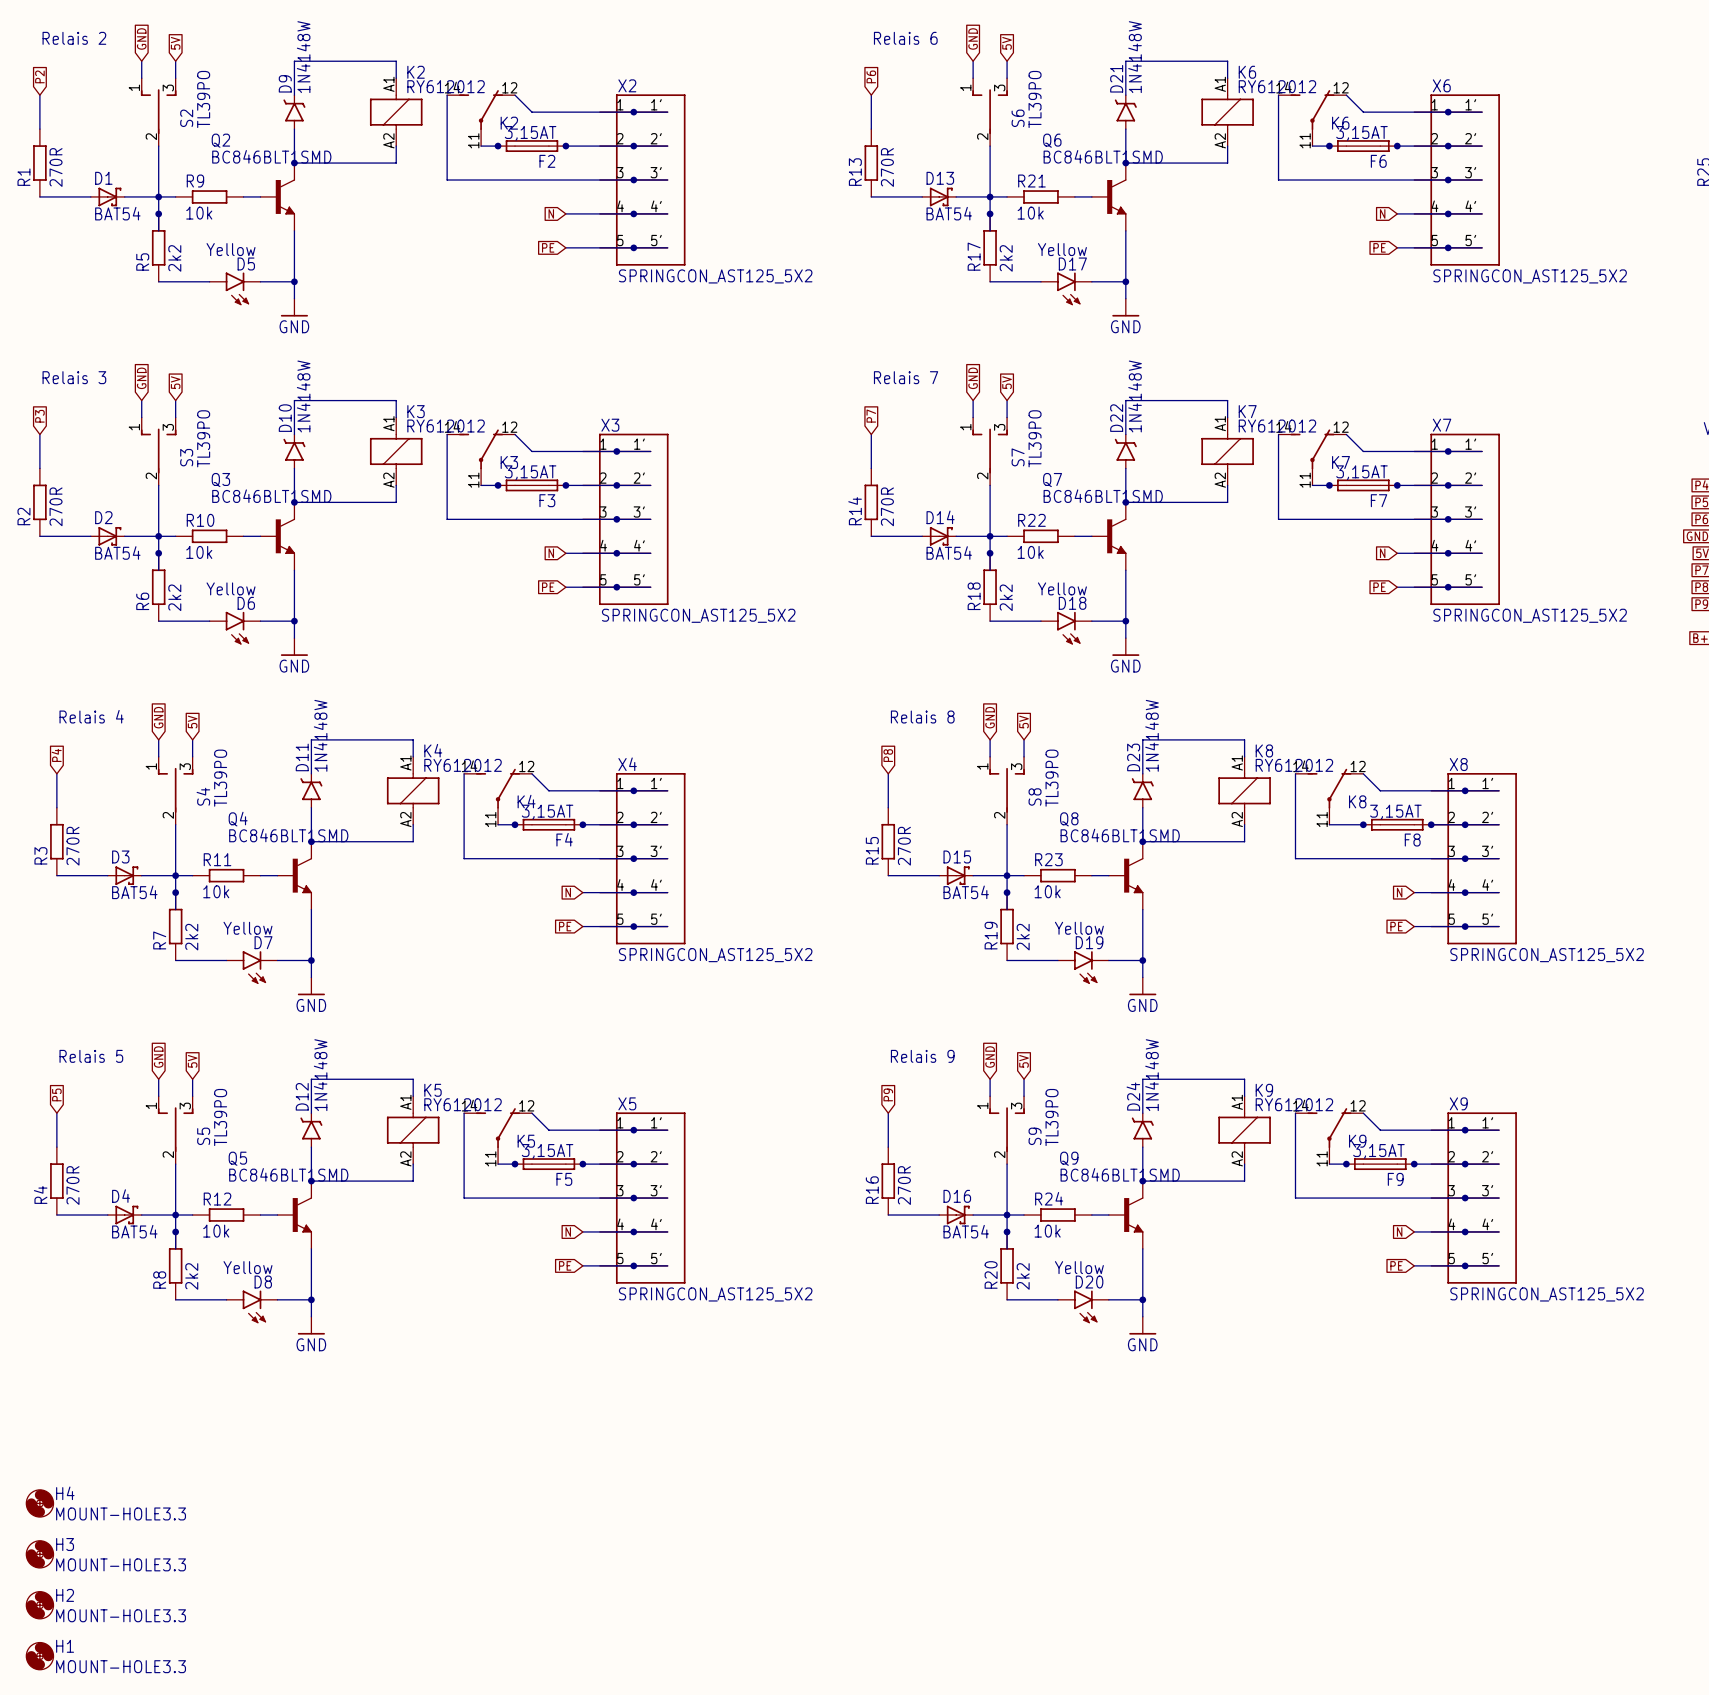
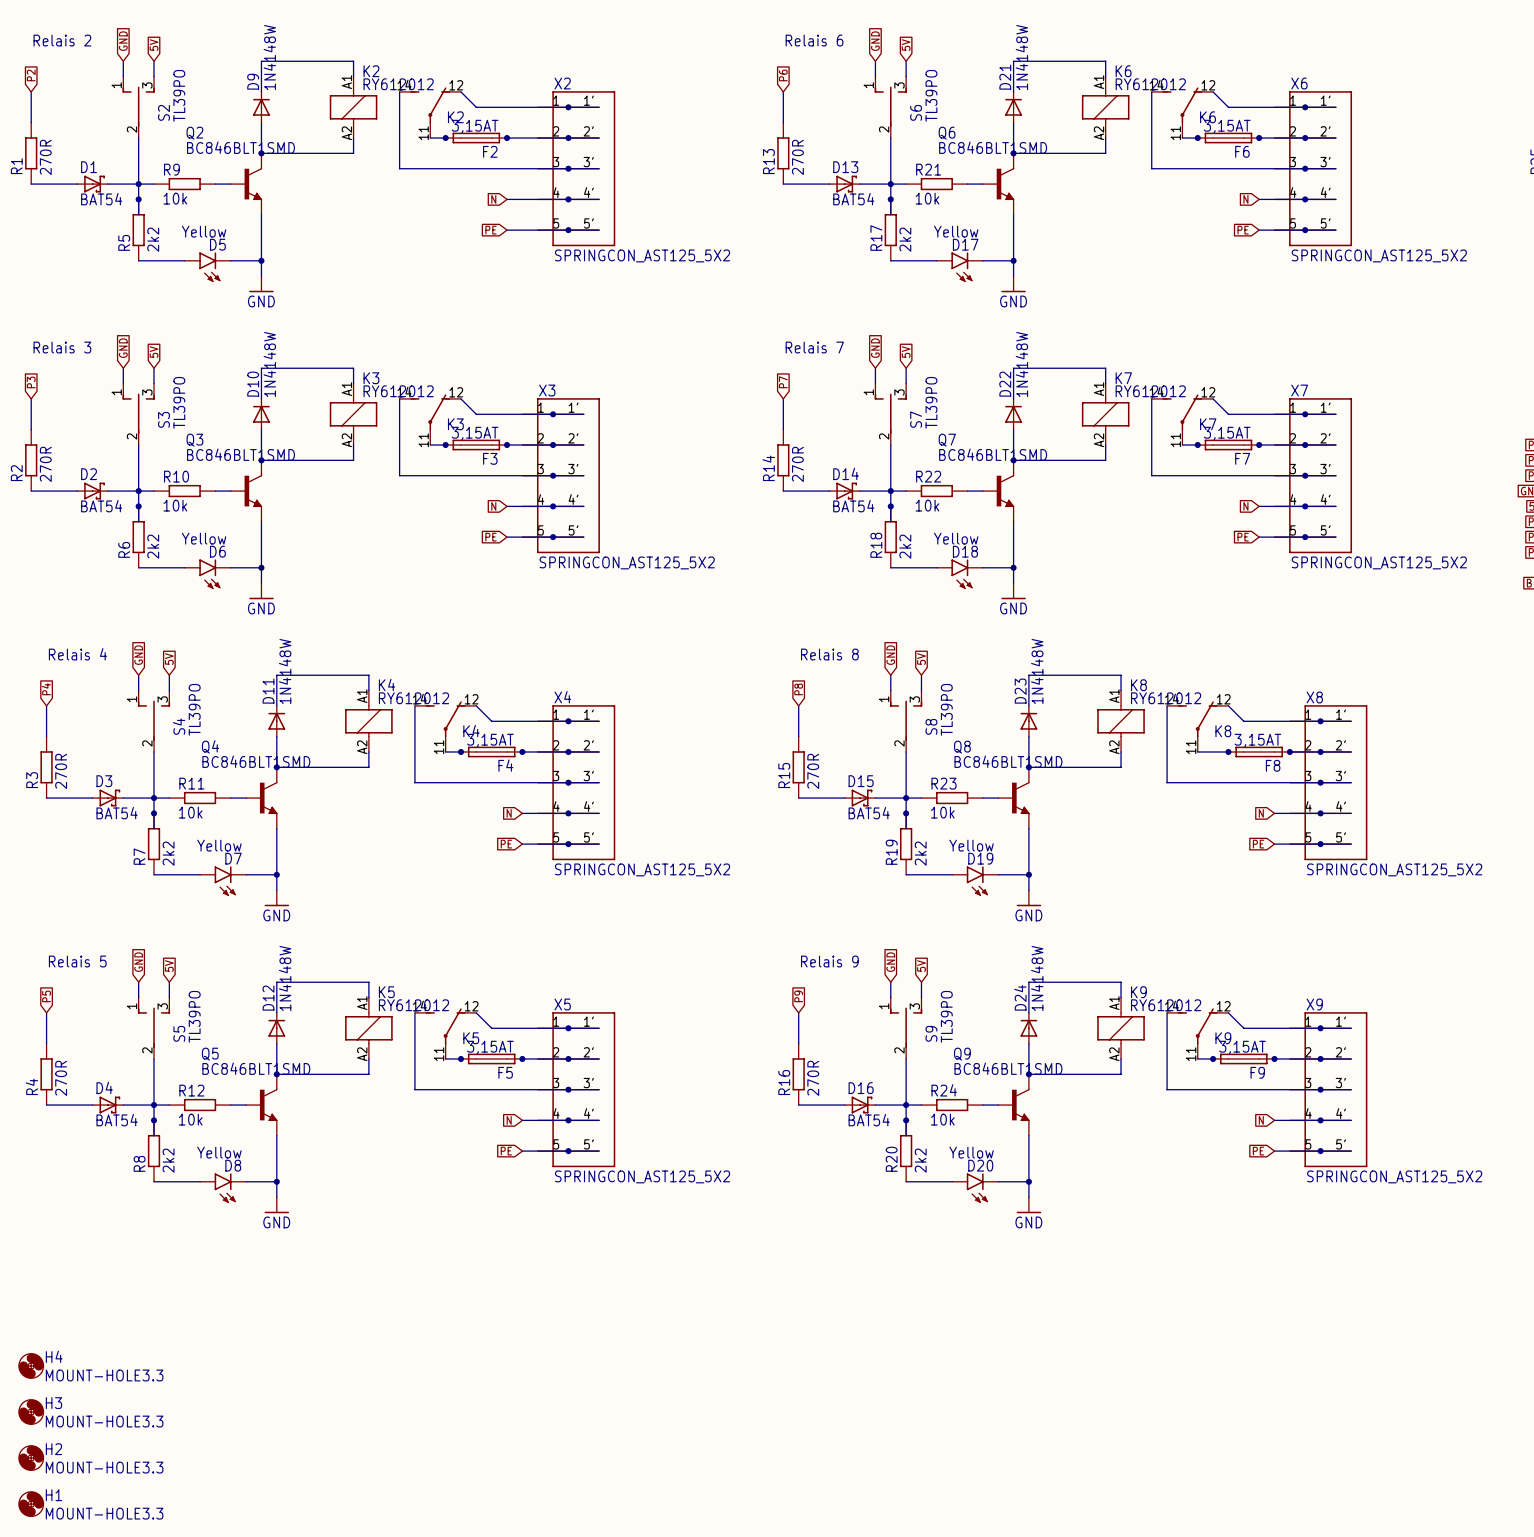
D9 symbol: [283, 94, 306, 130] -> [253, 91, 270, 123]
D21 symbol: [1114, 94, 1137, 130] -> [1005, 91, 1023, 123]
D10 symbol: [283, 434, 306, 469] -> [253, 398, 270, 430]
D22 symbol: [1114, 434, 1137, 469] -> [1005, 398, 1023, 430]
D11 symbol: [300, 773, 323, 809] -> [268, 705, 286, 737]
D23 symbol: [1131, 773, 1154, 809] -> [1020, 705, 1038, 737]
D12 symbol: [300, 1112, 323, 1148] -> [268, 1012, 286, 1044]
D24 symbol: [1131, 1112, 1154, 1148] -> [1020, 1012, 1038, 1044]

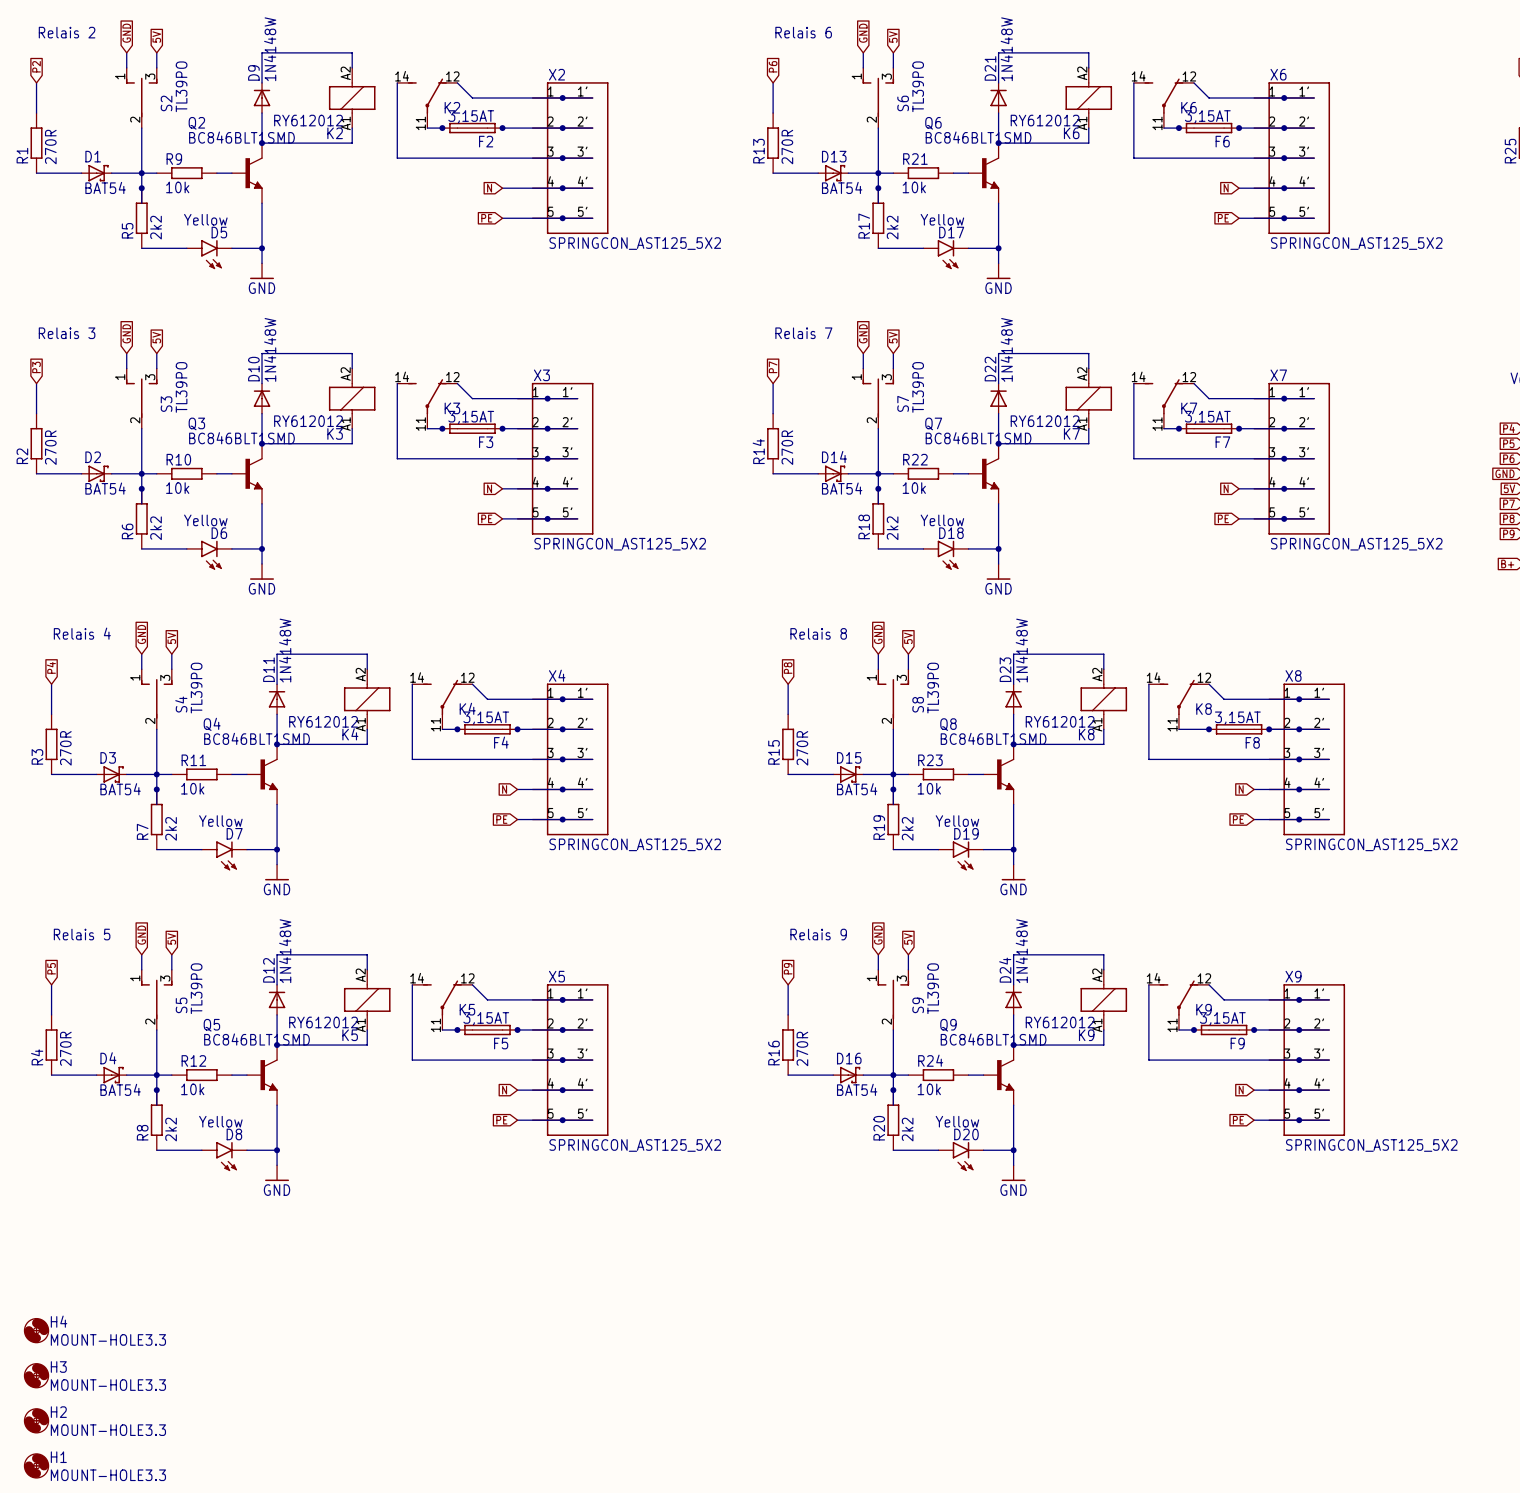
K2 rotation: 0° (353, 107) -> 180° (352, 98)
K6 rotation: 0° (1105, 107) -> 180° (1088, 98)
K3 rotation: 0° (353, 414) -> 180° (352, 398)
K7 rotation: 0° (1105, 414) -> 180° (1088, 398)
K4 rotation: 0° (368, 721) -> 180° (367, 699)
K8 rotation: 0° (1121, 721) -> 180° (1103, 699)
K5 rotation: 0° (368, 1028) -> 180° (367, 999)
K9 rotation: 0° (1121, 1028) -> 180° (1103, 999)

